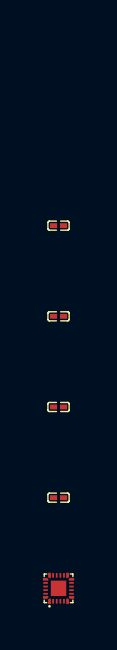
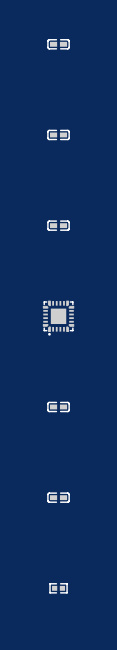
part: none -> (58, 44)
part: none -> (58, 134)
part footprint: [47, 311, 70, 322] -> [42, 300, 75, 336]
part footprint: [42, 572, 75, 608] -> [49, 583, 68, 594]

